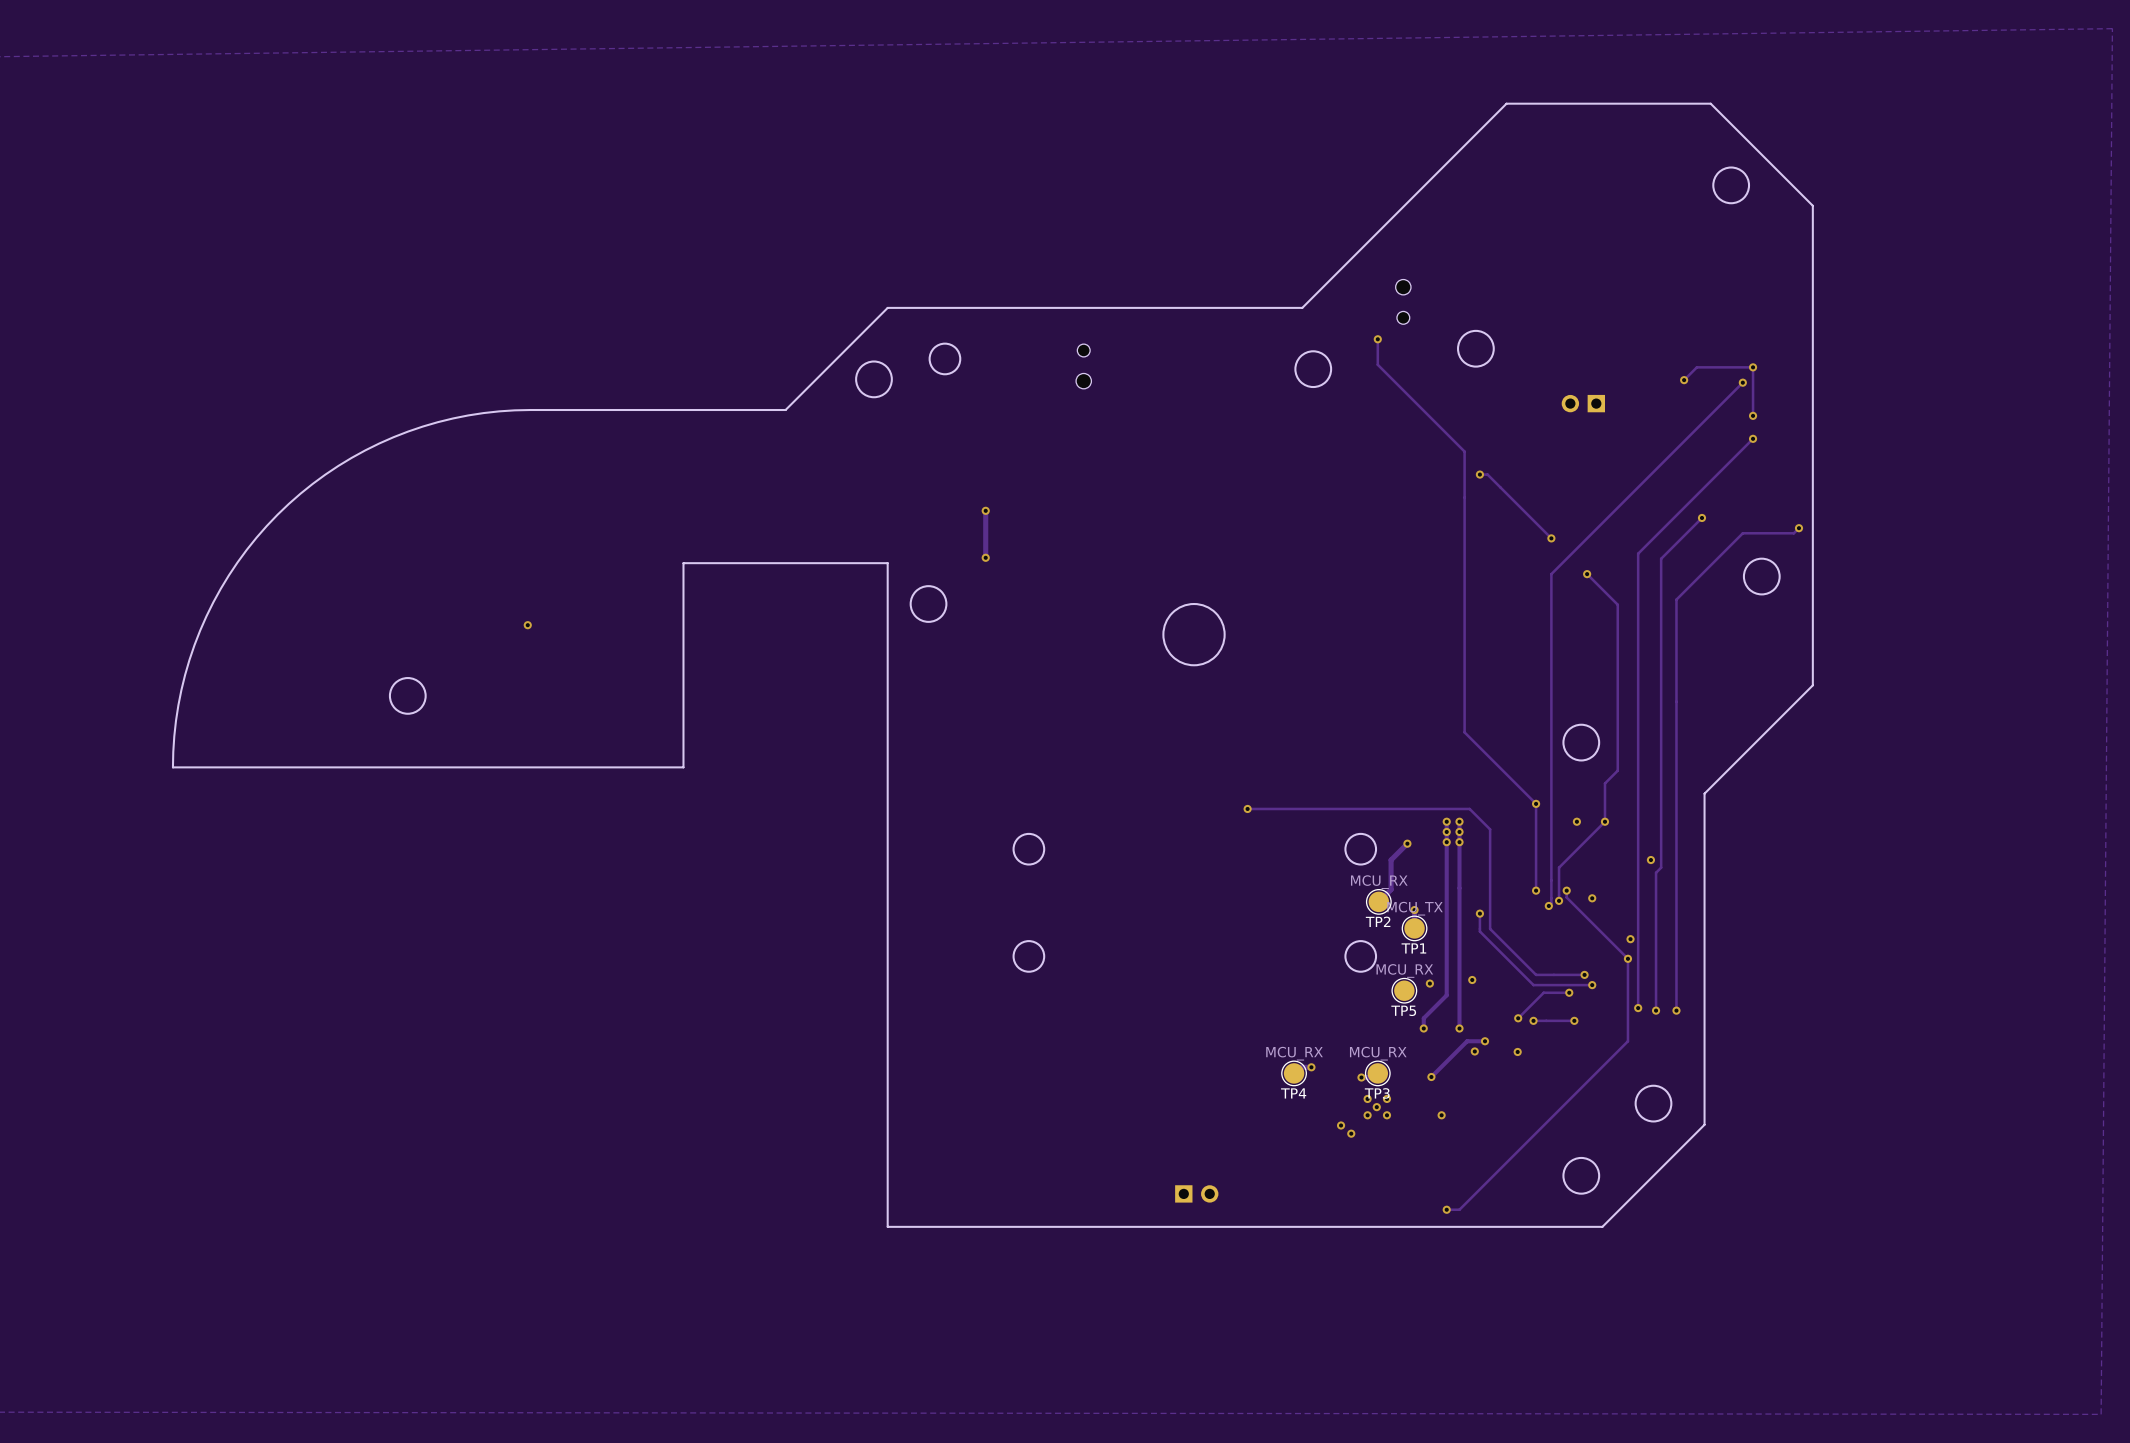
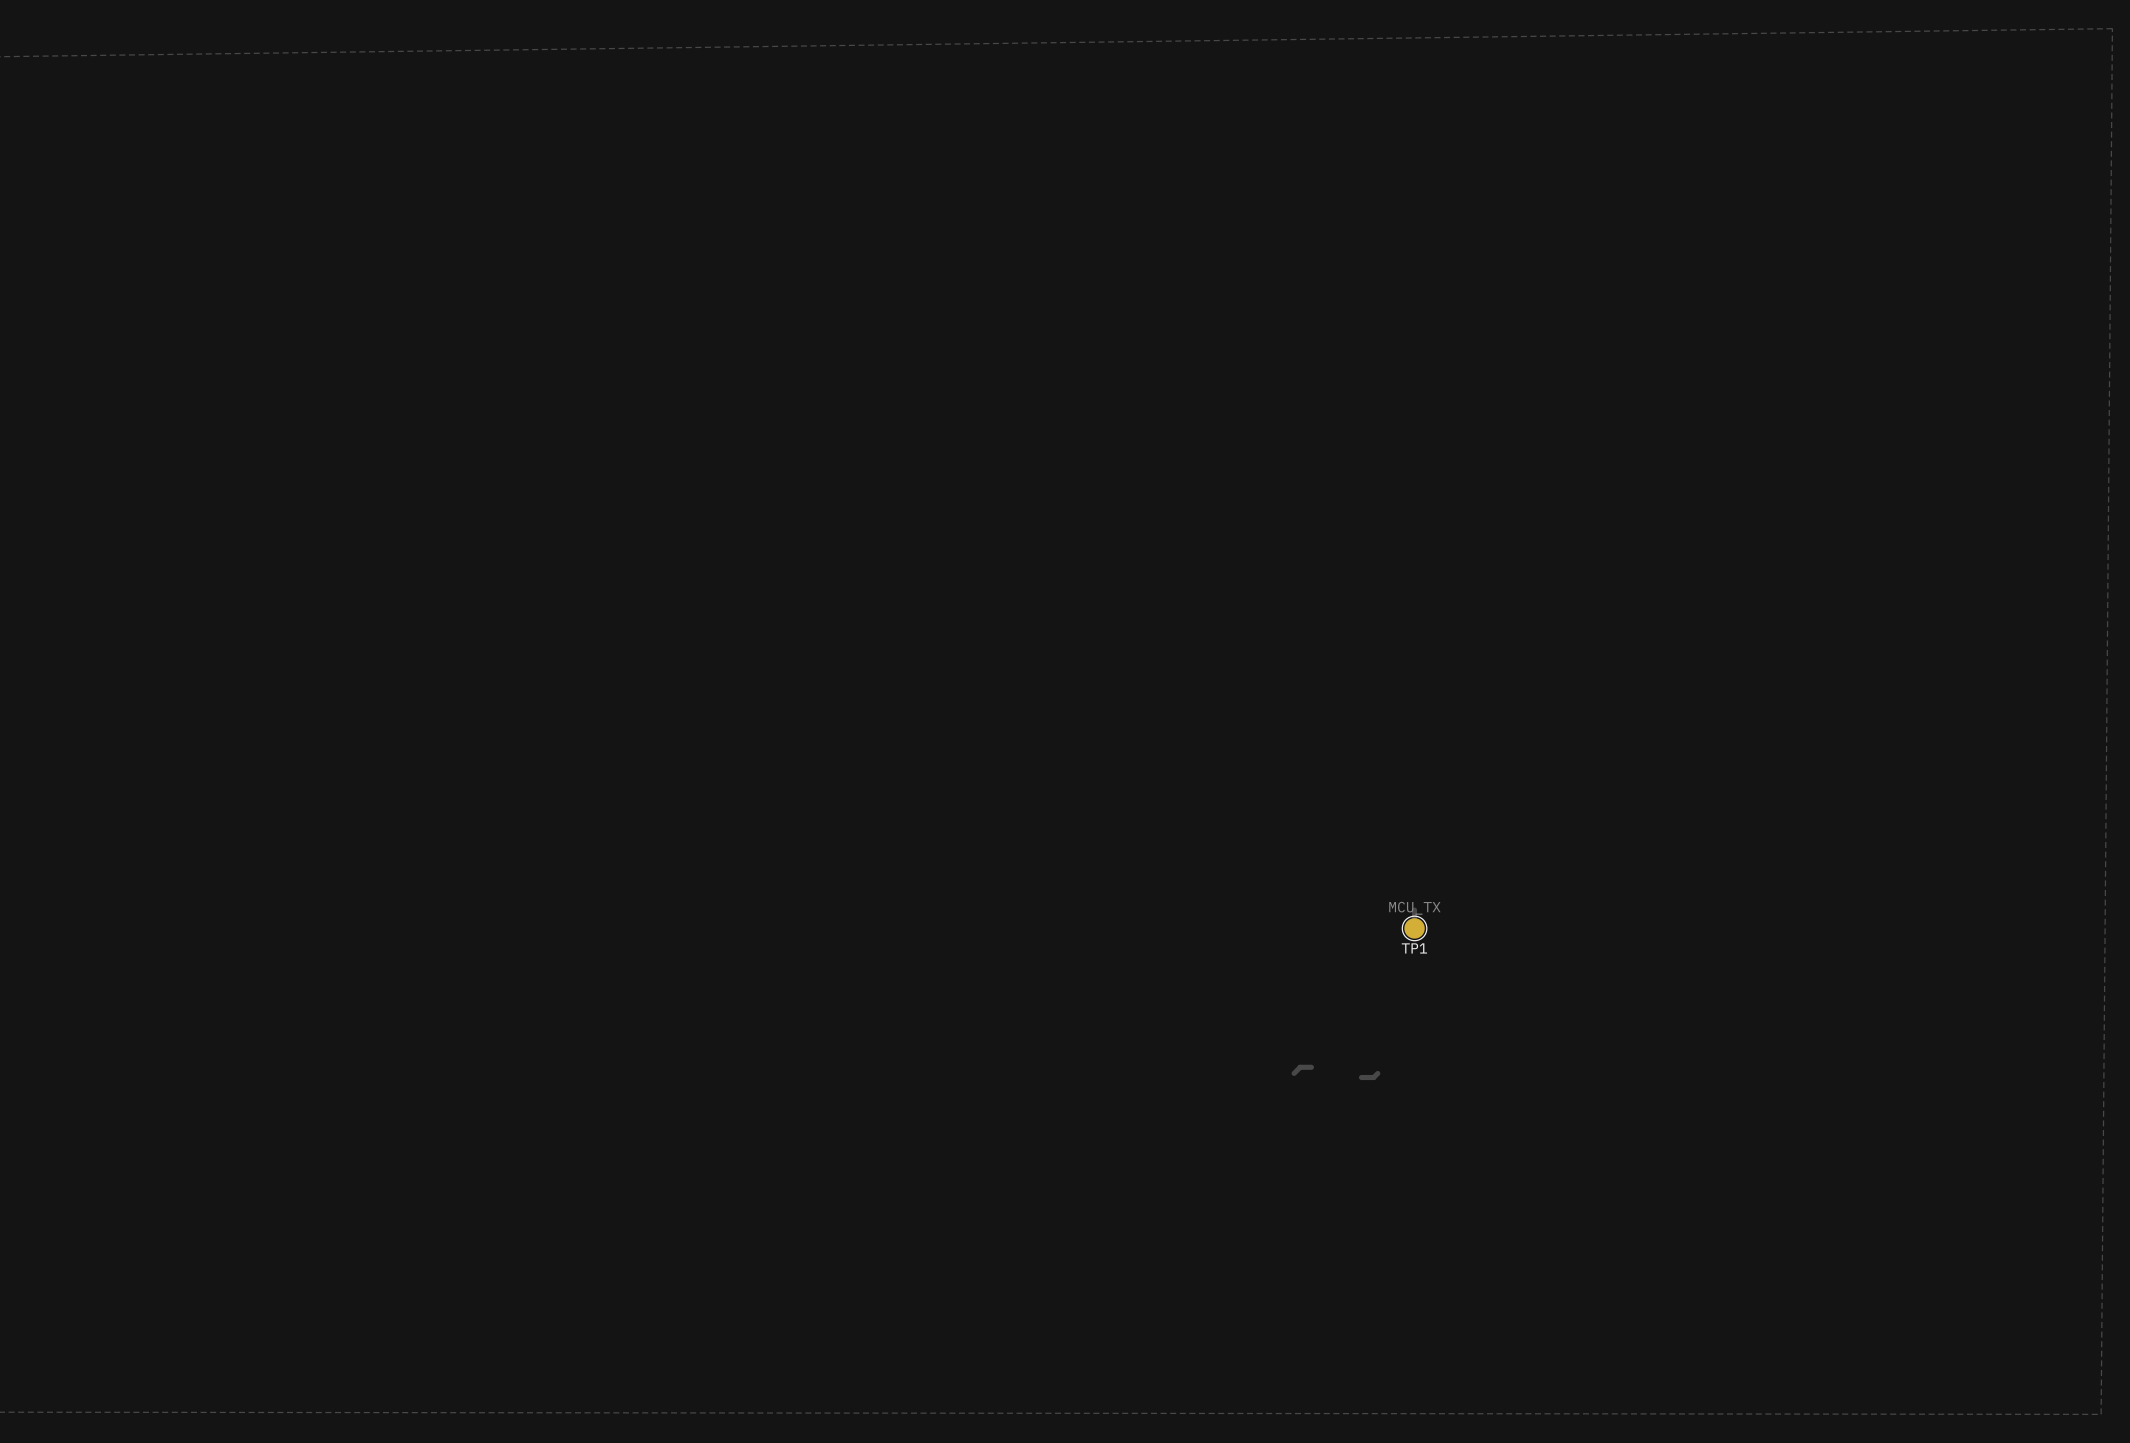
board edge: (1710, 103) (1812, 205) (1812, 685) (1704, 793) (1704, 1124) (1602, 1226) (887, 1226) (887, 563) (683, 563) (683, 767) (172, 767) (178, 705) (189, 659) (206, 616) (228, 575) (256, 537) (300, 493) (351, 457) (393, 437) (452, 418) (499, 411) (785, 410) (887, 307) (1302, 307) (1506, 103) (1710, 103) -> none
round board edge: [1712, 166, 1751, 205] -> none
part: (1403, 301) -> none
round board edge: [1457, 329, 1495, 368] -> none
track: (1377, 339) (1377, 364) (1464, 451) (1464, 732) (1536, 803) (1536, 890) -> none
via: (1377, 339) -> none
round board edge: [928, 342, 962, 376] -> none
round board edge: [1294, 350, 1333, 389] -> none
round board edge: [855, 360, 893, 399] -> none
part: (1083, 366) -> none
via: (1753, 367) -> none
track: (1684, 380) (1696, 367) (1753, 367) (1753, 415) -> none
via: (1684, 380) -> none
track: (1742, 382) (1551, 574) (1551, 903) (1548, 905) -> none
via: (1742, 382) -> none
part: (1583, 403) -> none
via: (1753, 415) -> none
track: (1753, 438) (1638, 553) (1638, 1008) -> none
via: (1753, 438) -> none
track: (1479, 474) (1487, 474) (1551, 538) -> none
via: (1479, 474) -> none
track: (985, 510) (985, 557) -> none
via: (985, 510) -> none
track: (1701, 517) (1661, 558) (1661, 867) (1656, 872) (1656, 1010) -> none
via: (1701, 517) -> none
track: (1798, 528) (1793, 533) (1742, 533) (1676, 599) (1676, 1010) -> none
via: (1798, 528) -> none
via: (1551, 538) -> none
via: (985, 557) -> none
round board edge: [1742, 557, 1781, 596] -> none
track: (1587, 574) (1617, 604) (1617, 770) (1604, 783) (1604, 821) (1559, 867) (1559, 900) -> none
via: (1587, 574) -> none
round board edge: [909, 585, 948, 623] -> none
round board edge: [1162, 602, 1226, 667] -> none
via: (527, 625) -> none
round board edge: [388, 677, 427, 715] -> none
round board edge: [1562, 723, 1601, 762] -> none
via: (1536, 803) -> none
track: (1247, 808) (1469, 808) (1490, 829) (1490, 928) (1536, 974) (1584, 974) -> none
via: (1247, 808) -> none
track: (1446, 821) (1446, 995) (1423, 1018) (1423, 1028) -> none
via: (1446, 821) -> none
track: (1459, 821) (1459, 1028) -> none
via: (1459, 821) -> none
via: (1576, 821) -> none
via: (1604, 821) -> none
via: (1446, 831) -> none
via: (1459, 831) -> none
round board edge: [1012, 832, 1046, 866] -> none
round board edge: [1344, 832, 1378, 866] -> none
via: (1446, 842) -> none
via: (1459, 842) -> none
track: (1407, 843) (1391, 860) (1391, 889) (1378, 901) -> none
via: (1407, 843) -> none
via: (1650, 860) -> none
via: (1536, 890) -> none
track: (1566, 890) (1566, 897) (1627, 958) (1627, 1041) (1459, 1209) (1446, 1209) -> none
via: (1566, 890) -> none
via: (1592, 898) -> none
via: (1559, 900) -> none
TP2: MCU_RX (1378, 901) -> none
via: (1548, 905) -> none
via: (1414, 910) -> none
track: (1479, 913) (1479, 931) (1533, 985) (1592, 985) -> none
via: (1479, 913) -> none
via: (1630, 939) -> none
round board edge: [1012, 940, 1046, 973] -> none
round board edge: [1344, 940, 1378, 973] -> none
via: (1627, 958) -> none
via: (1584, 974) -> none
via: (1472, 980) -> none
via: (1429, 983) -> none
via: (1592, 985) -> none
TP5: MCU_RX (1404, 990) -> none
track: (1569, 992) (1543, 992) (1518, 1018) -> none
via: (1569, 992) -> none
via: (1638, 1008) -> none
via: (1656, 1010) -> none
via: (1676, 1010) -> none
via: (1518, 1018) -> none
via: (1533, 1020) -> none
track: (1574, 1020) (1533, 1020) -> none
via: (1574, 1020) -> none
via: (1423, 1028) -> none
via: (1459, 1028) -> none
track: (1485, 1041) (1467, 1041) (1431, 1077) -> none
via: (1485, 1041) -> none
via: (1474, 1051) -> none
via: (1517, 1051) -> none
via: (1311, 1067) -> none
TP4: MCU_RX (1294, 1073) -> none
TP3: MCU_RX (1377, 1073) -> none
via: (1361, 1077) -> none
via: (1431, 1077) -> none
round board edge: [1634, 1084, 1673, 1123] -> none
via: (1367, 1098) -> none
via: (1386, 1098) -> none
via: (1376, 1107) -> none
via: (1367, 1115) -> none
via: (1386, 1115) -> none
via: (1441, 1115) -> none
via: (1341, 1125) -> none
via: (1351, 1133) -> none
round board edge: [1562, 1156, 1601, 1195] -> none
part: (1196, 1193) -> none
via: (1446, 1209) -> none

